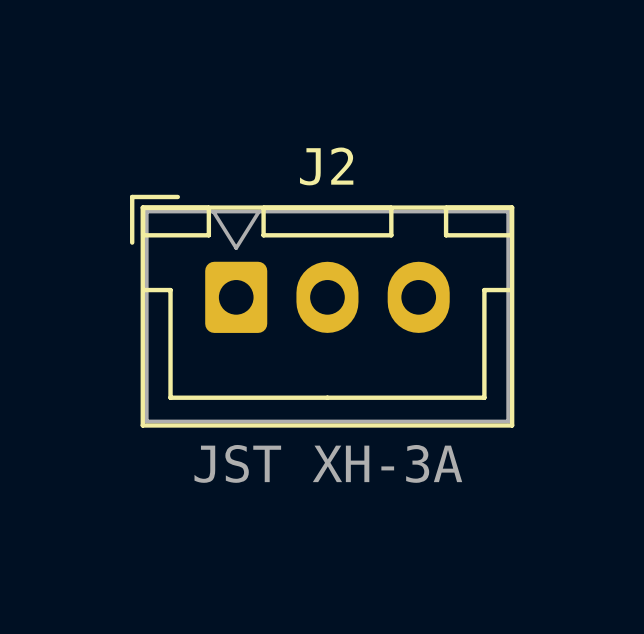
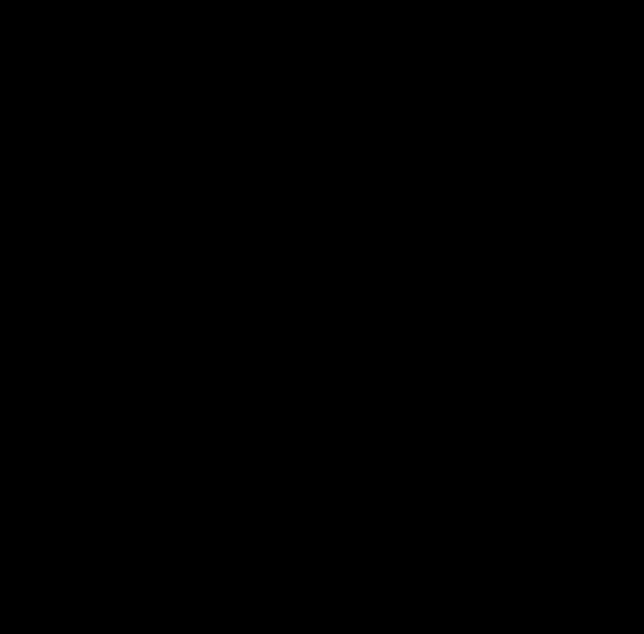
J2: JST XH-3A (322, 311) -> none

